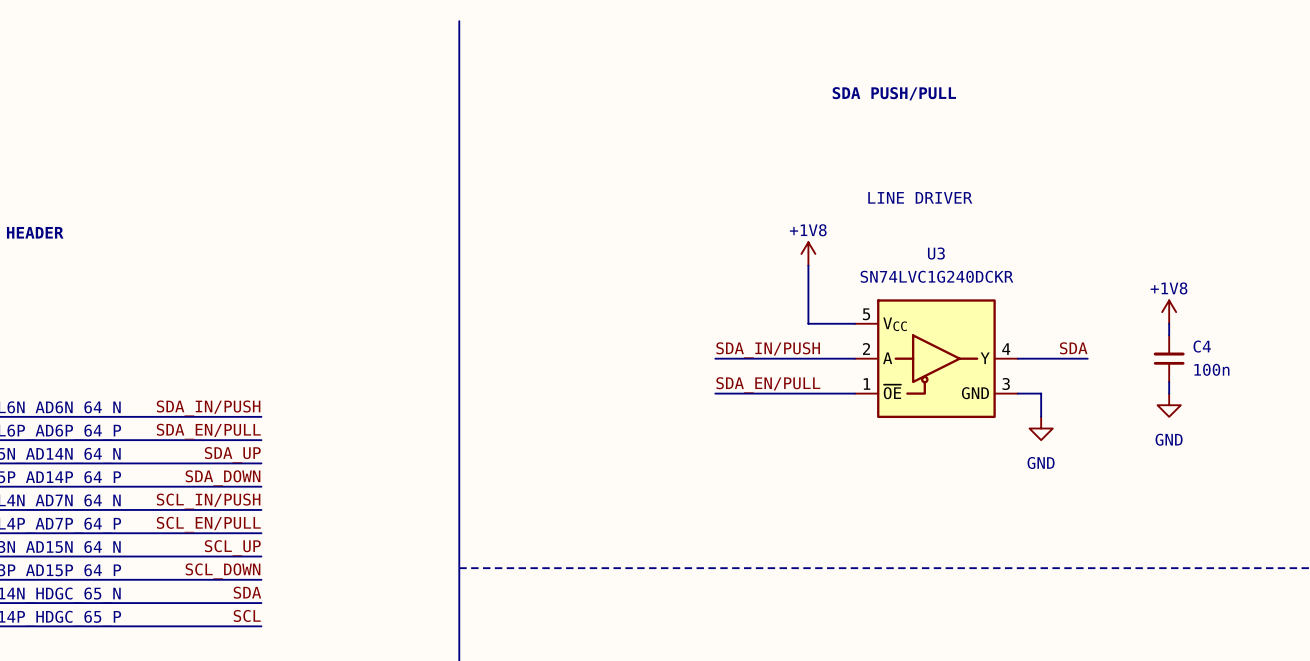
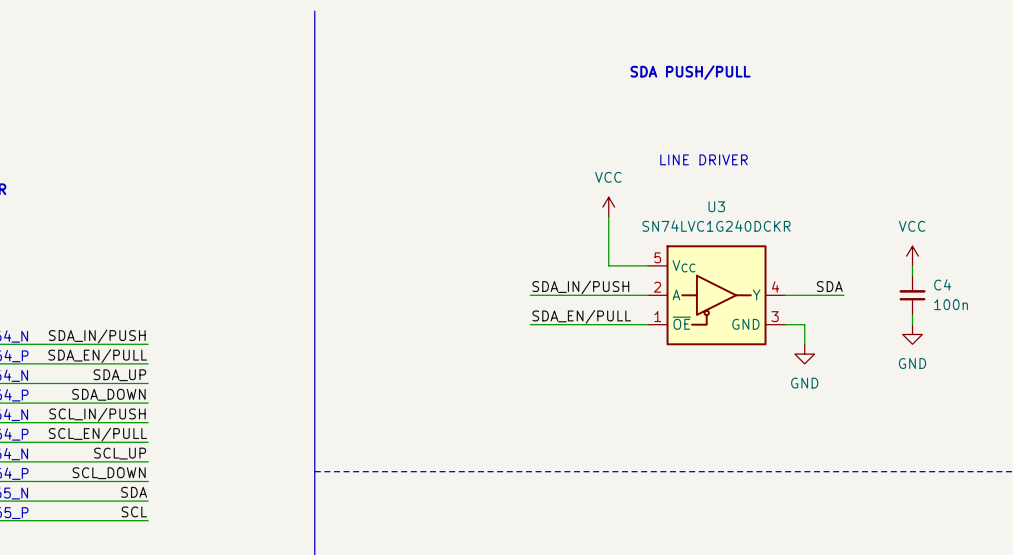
power symbol: +1V8 (808, 253) -> VCC (608, 207)
power symbol: +1V8 (1169, 312) -> VCC (912, 256)

